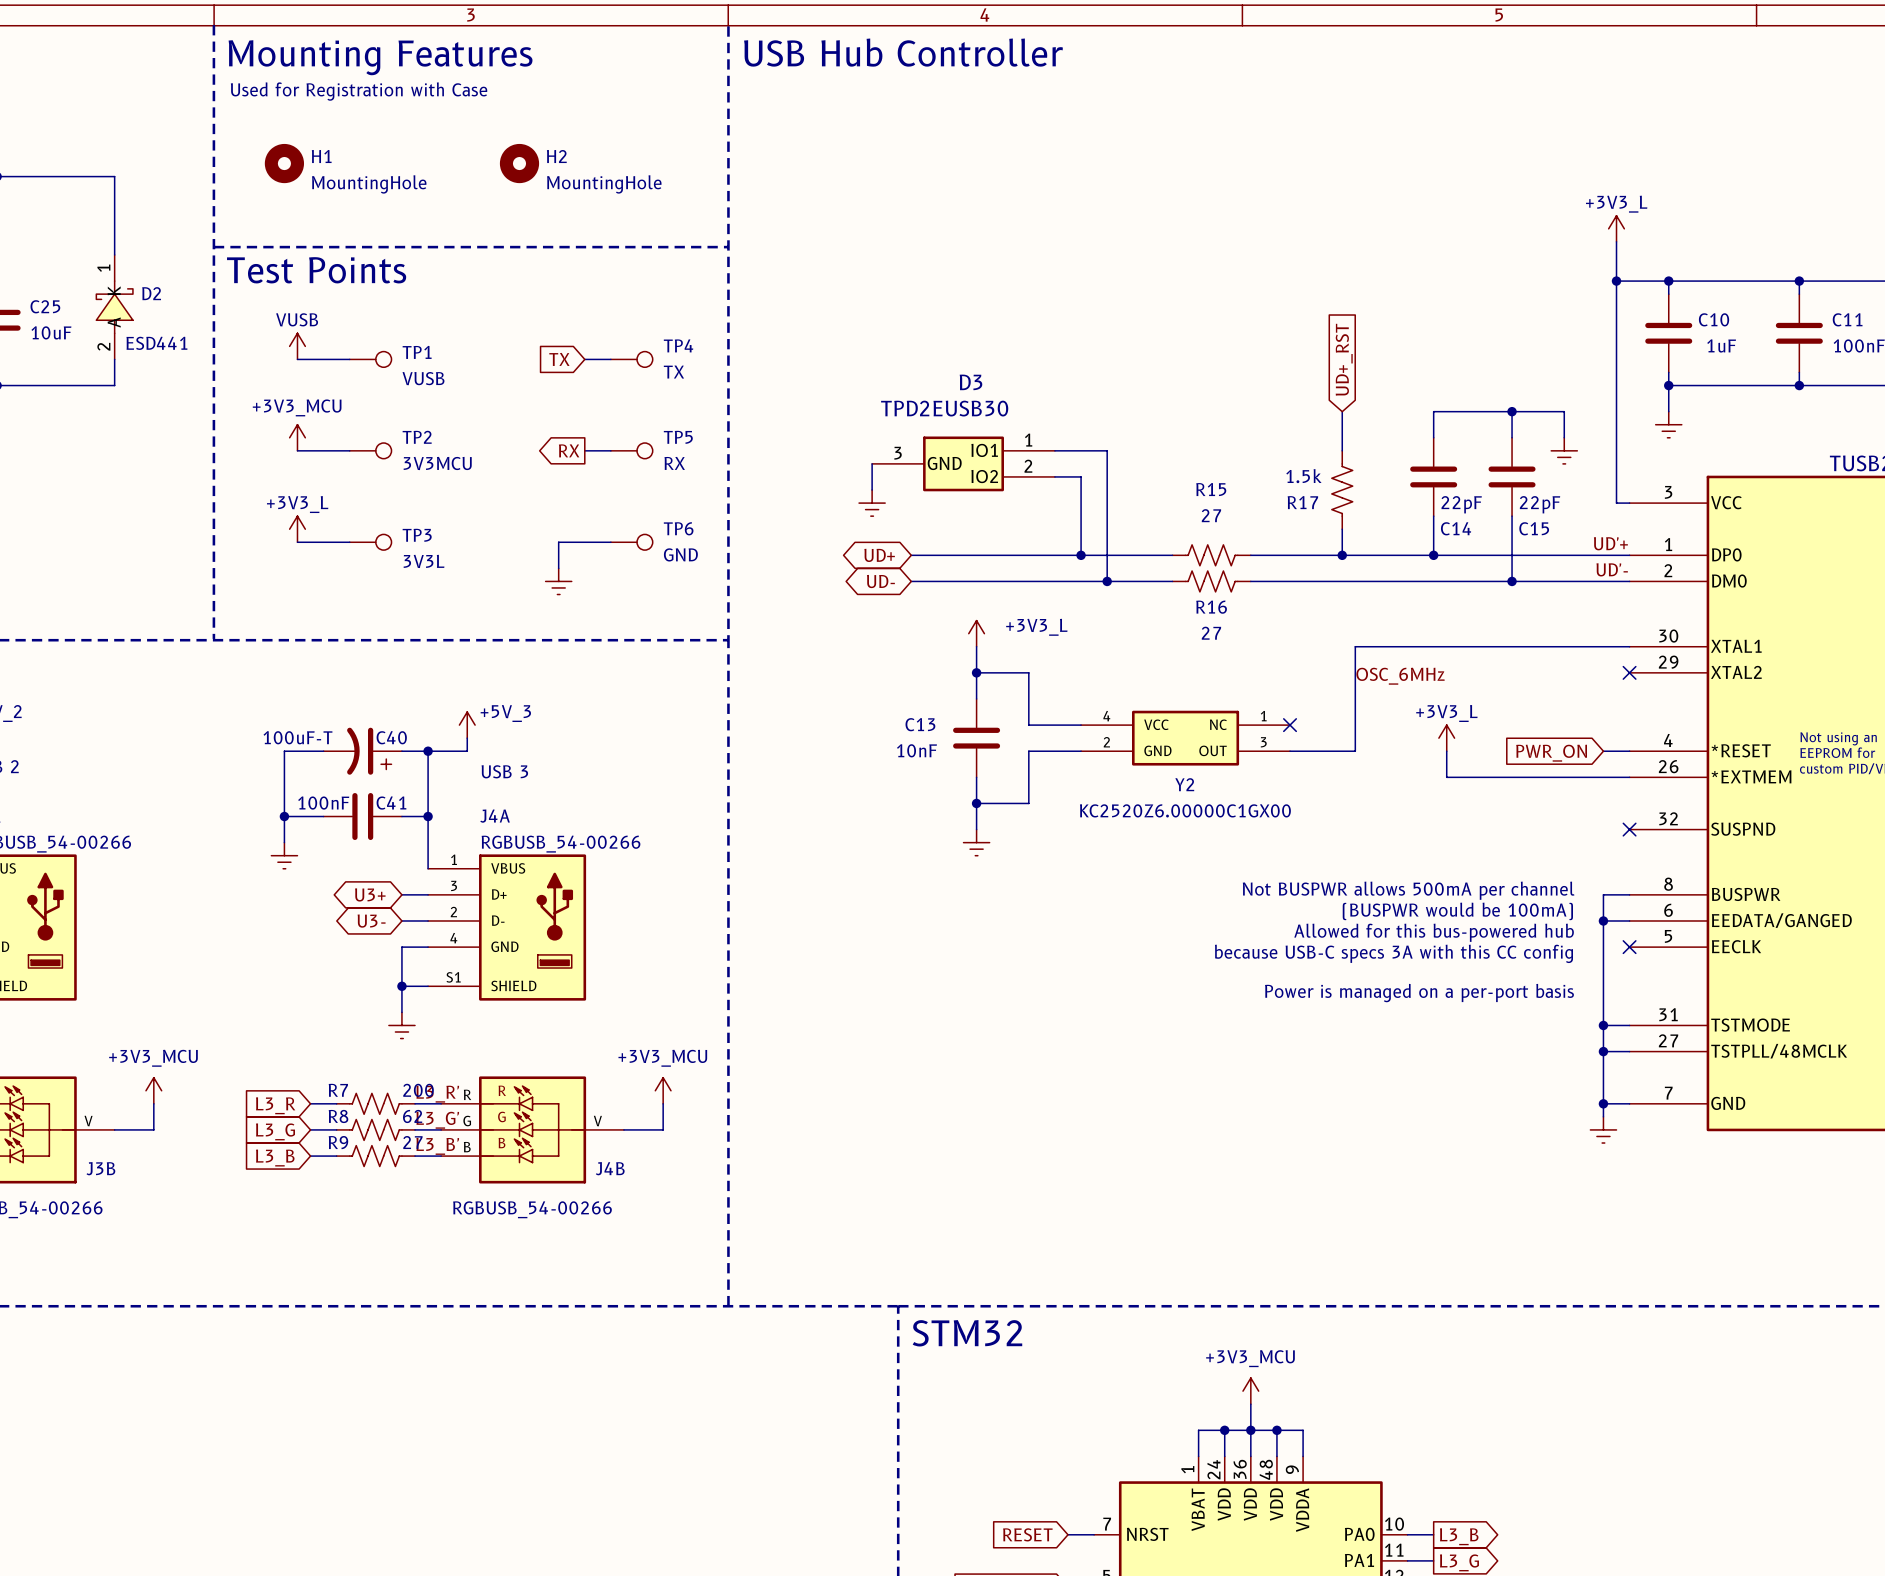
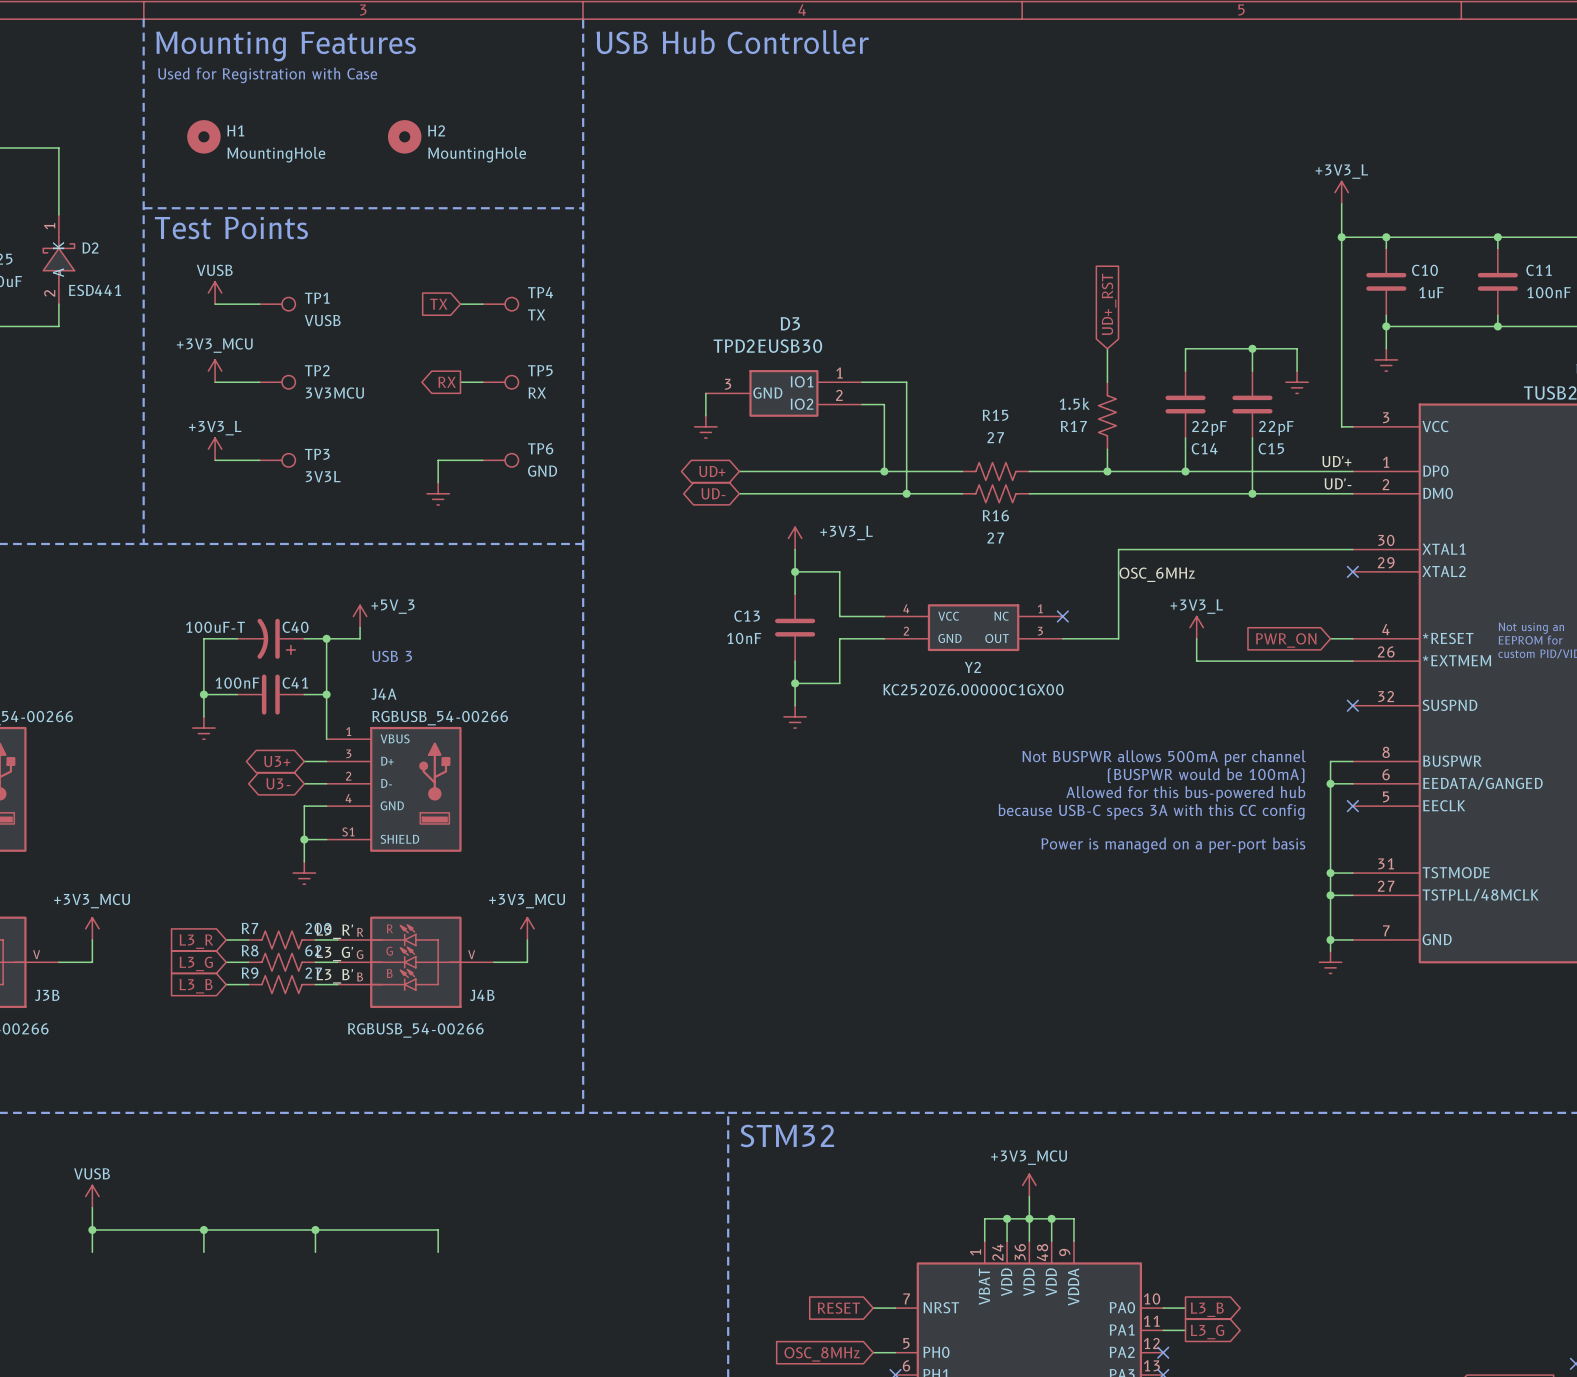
power symbol: none -> VUSB (92, 1196)
wire: none -> (92, 1207) (92, 1252)
wire: none -> (92, 1229) (438, 1229) (438, 1252)
junction: none -> (92, 1229)
wire: none -> (203, 1229) (203, 1252)
junction: none -> (203, 1229)
wire: none -> (315, 1229) (315, 1252)
junction: none -> (315, 1229)

